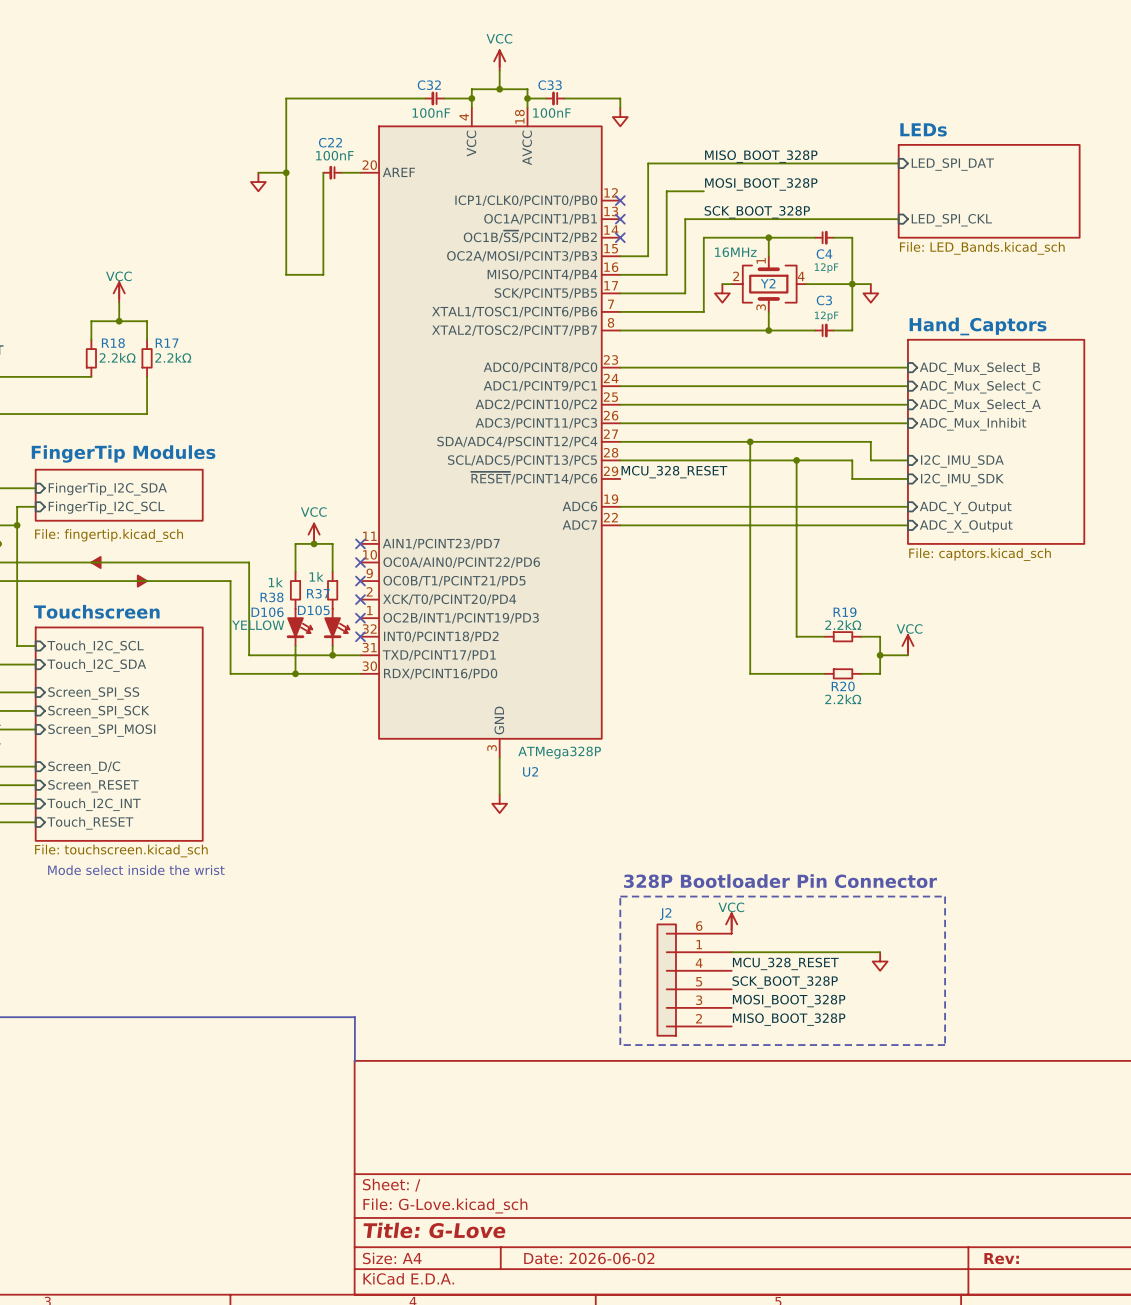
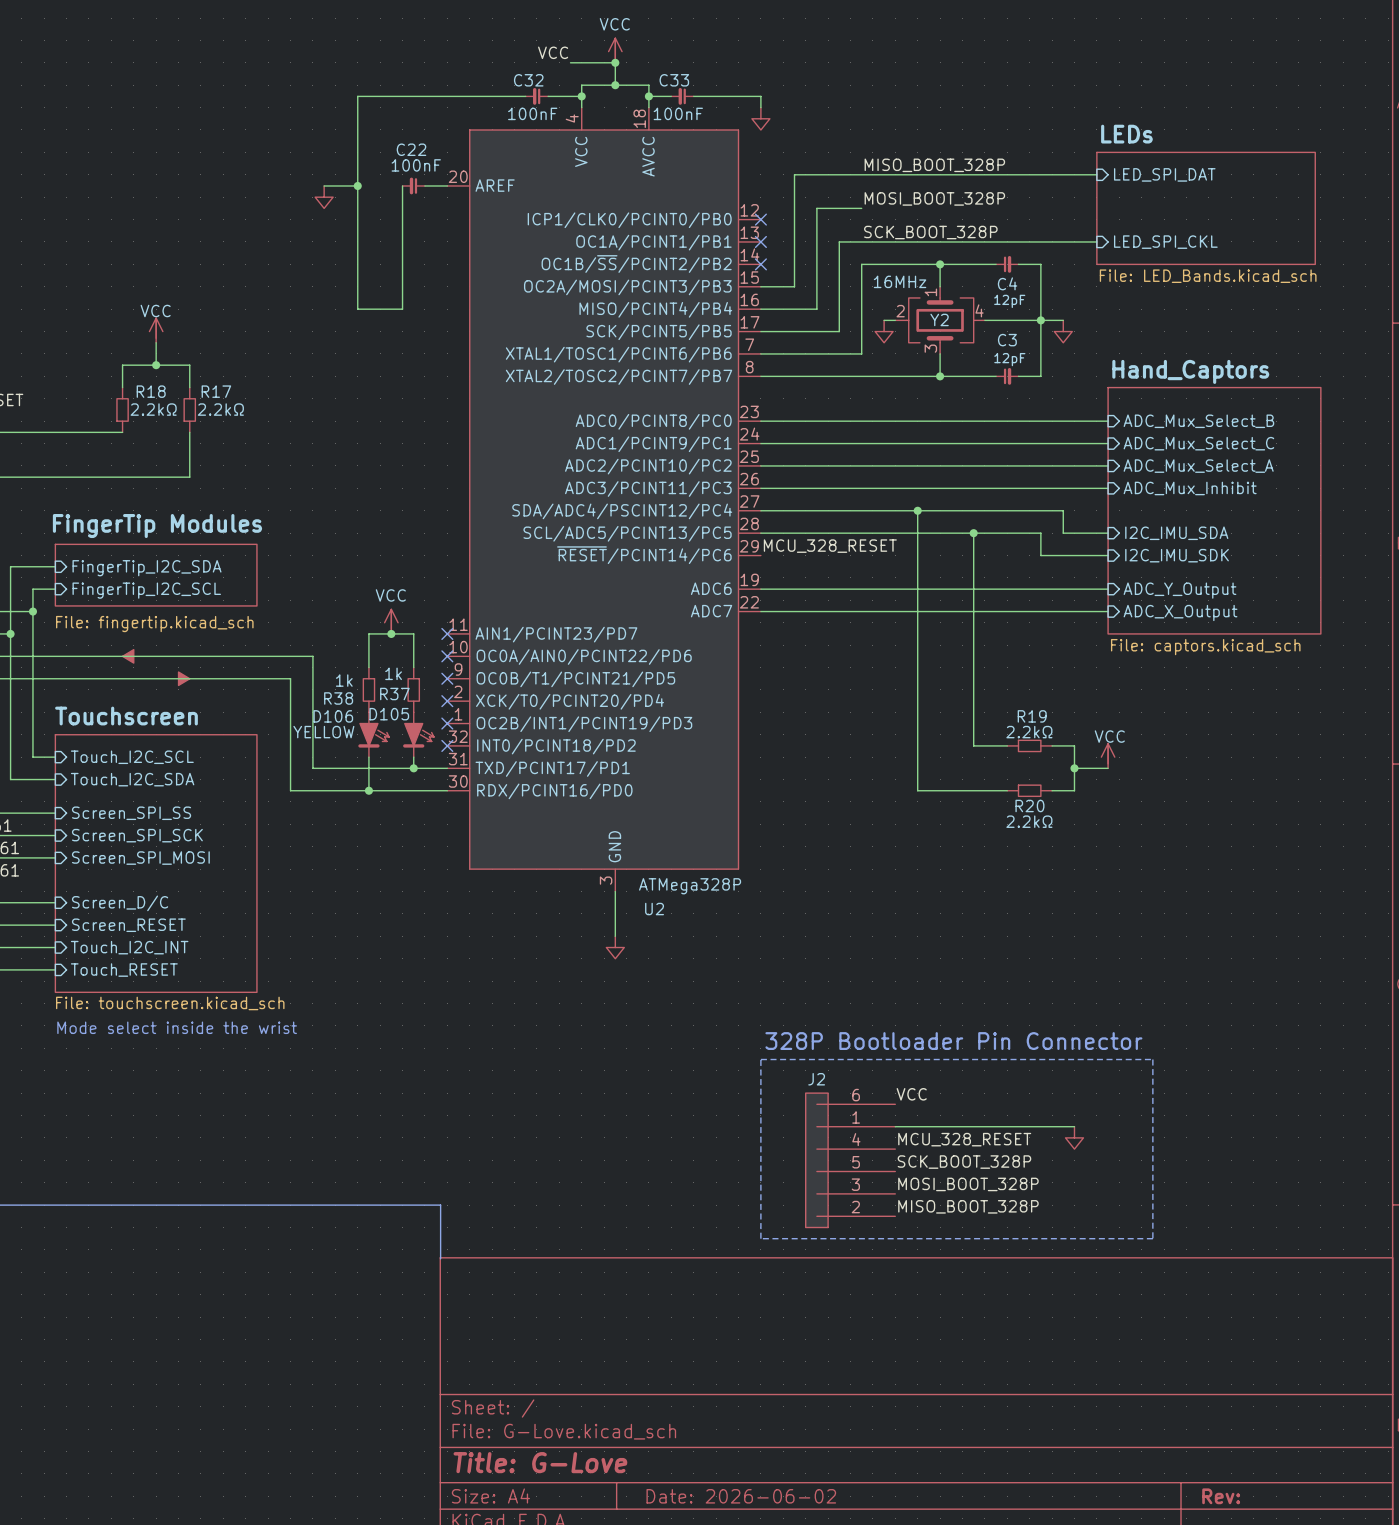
label: none -> VCC (553, 52)
wire: none -> (570, 62) (615, 62)
junction: none -> (615, 62)
power symbol: VCC (731, 923) -> none
label: none -> VCC (911, 1094)

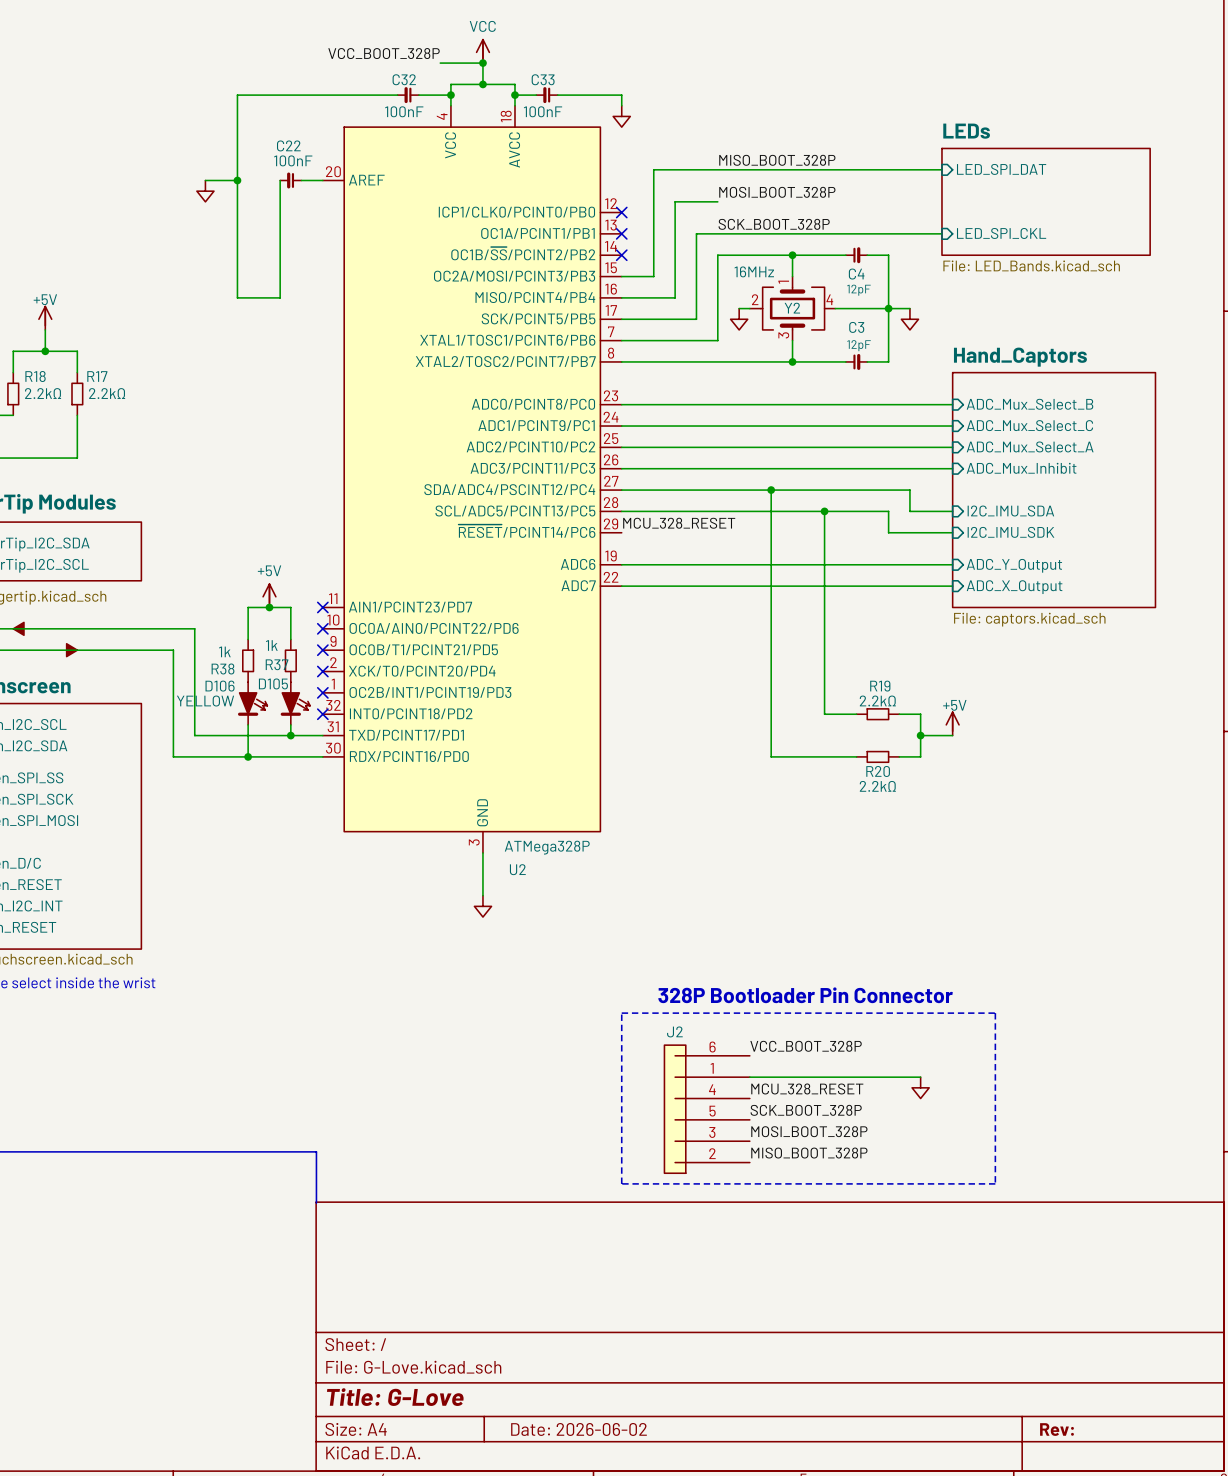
label: VCC (553, 52) -> VCC_BOOT_328P (384, 53)
power symbol: VCC (156, 330) -> +5V (45, 318)
power symbol: VCC (391, 621) -> +5V (269, 595)
power symbol: VCC (1108, 756) -> +5V (952, 723)
label: VCC (911, 1094) -> VCC_BOOT_328P (806, 1046)

